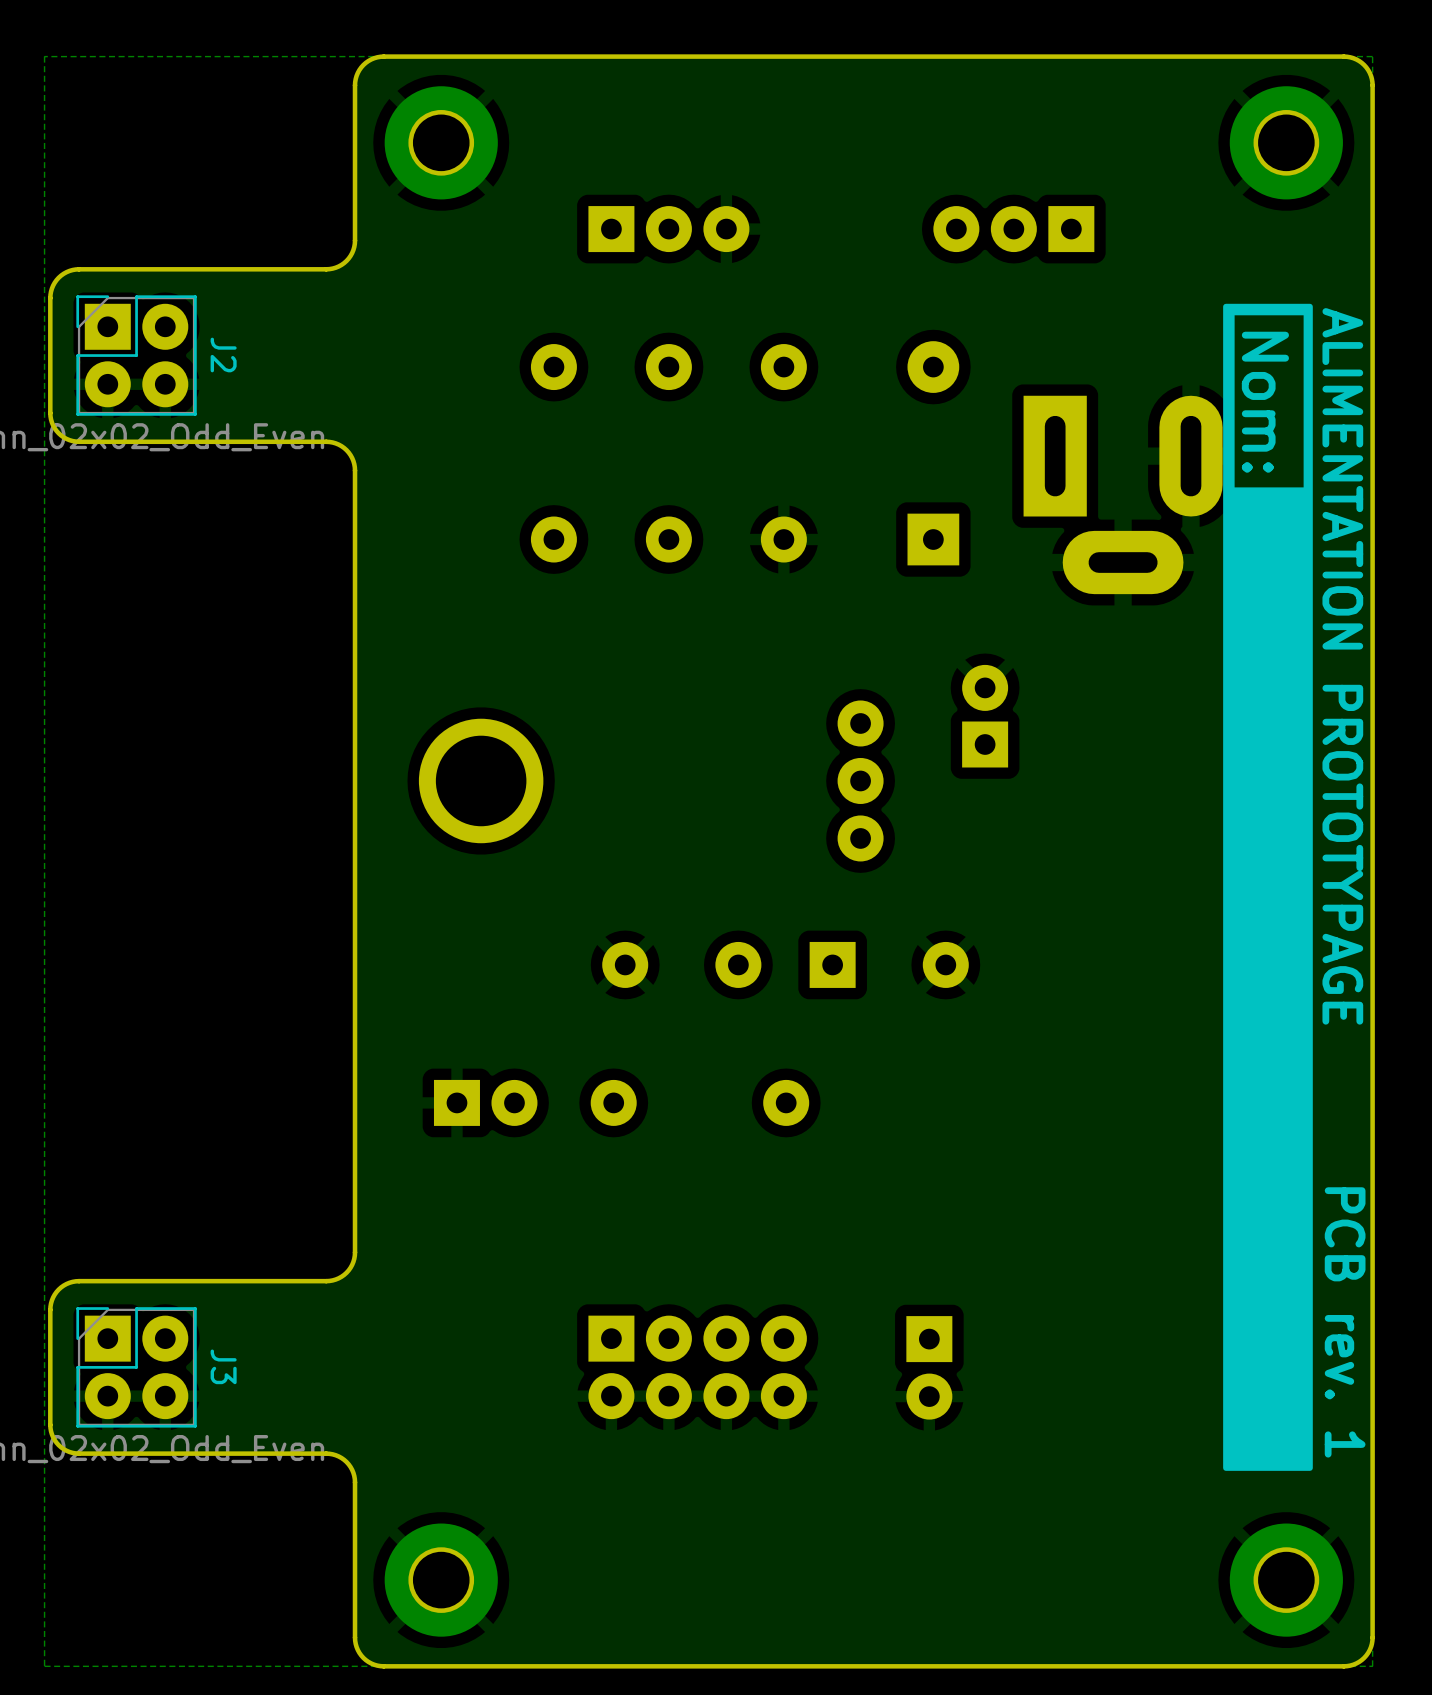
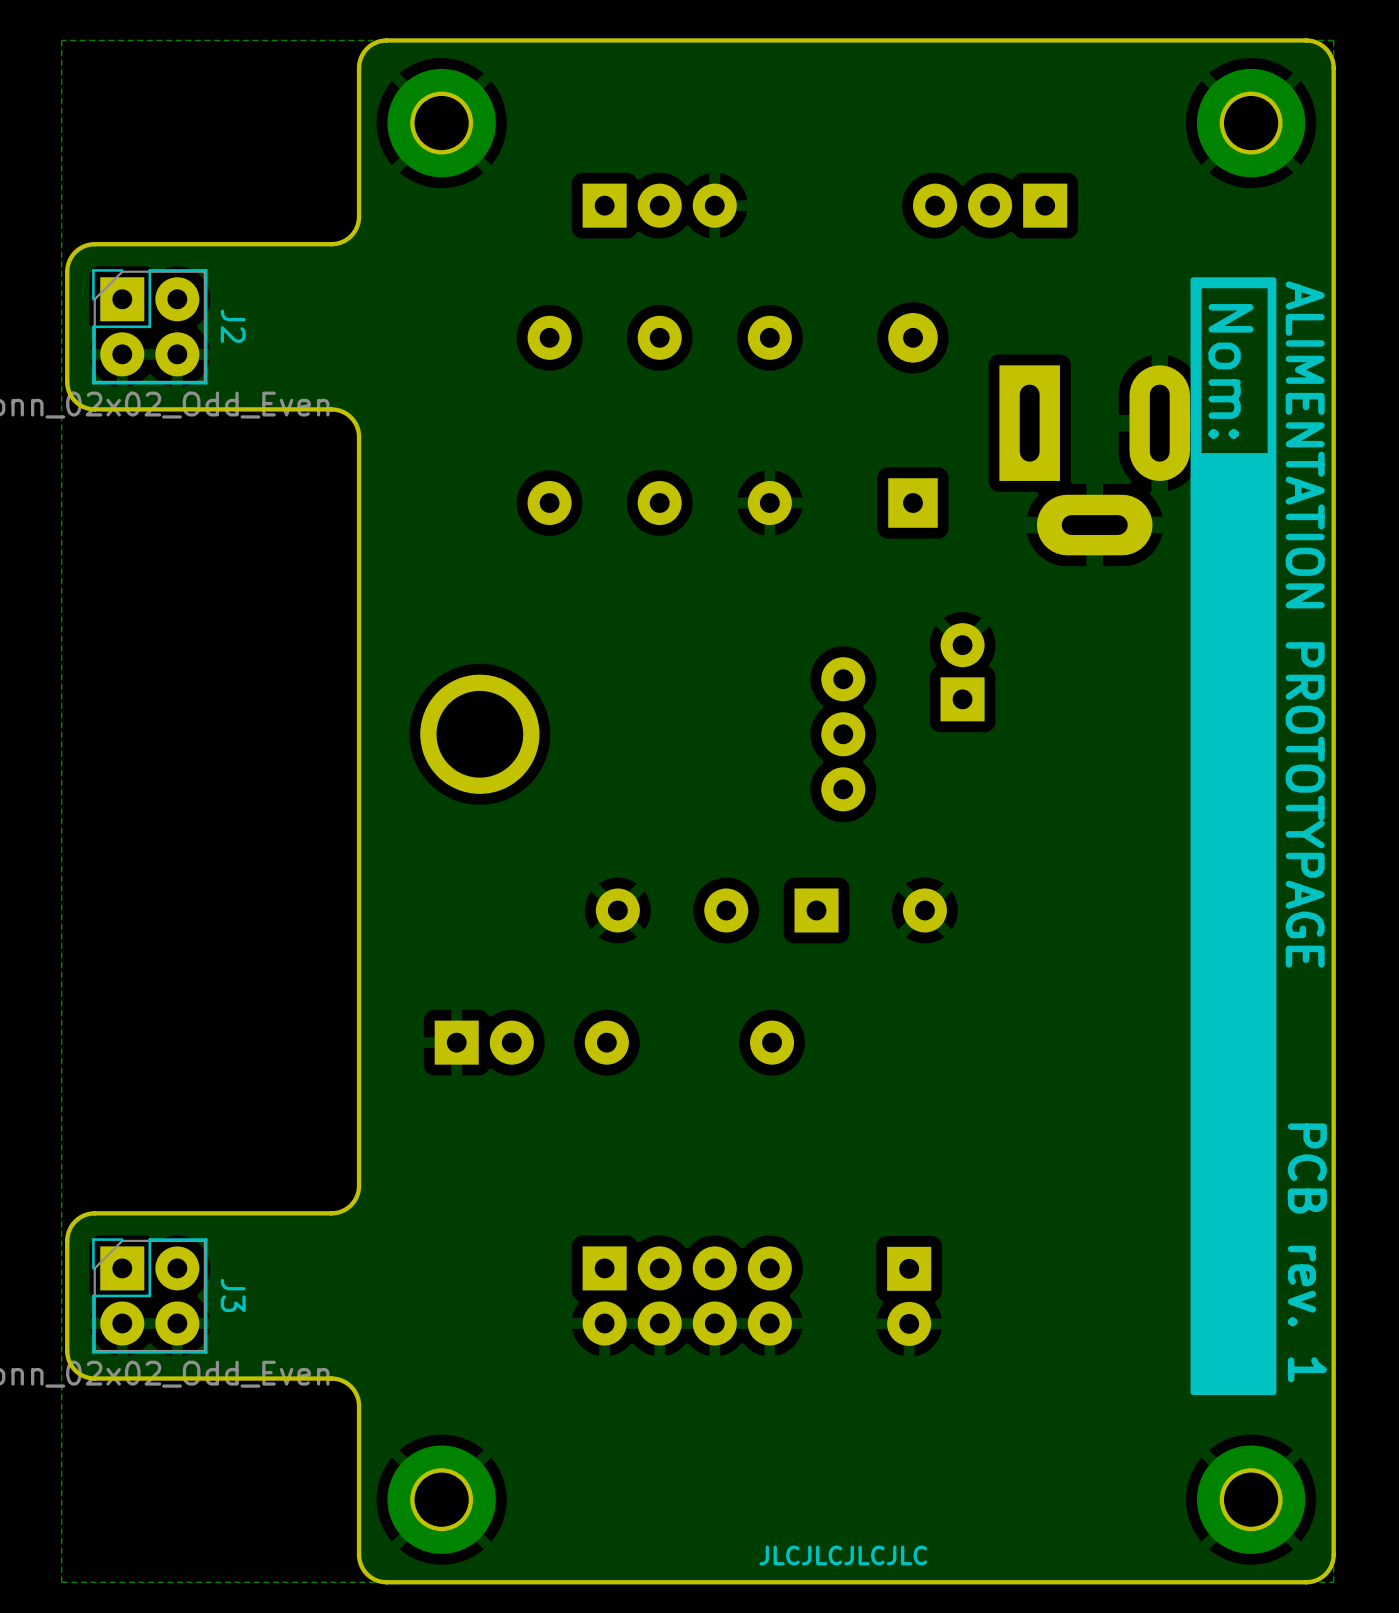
text: none -> JLCJLCJLCJLC (843, 1555)

